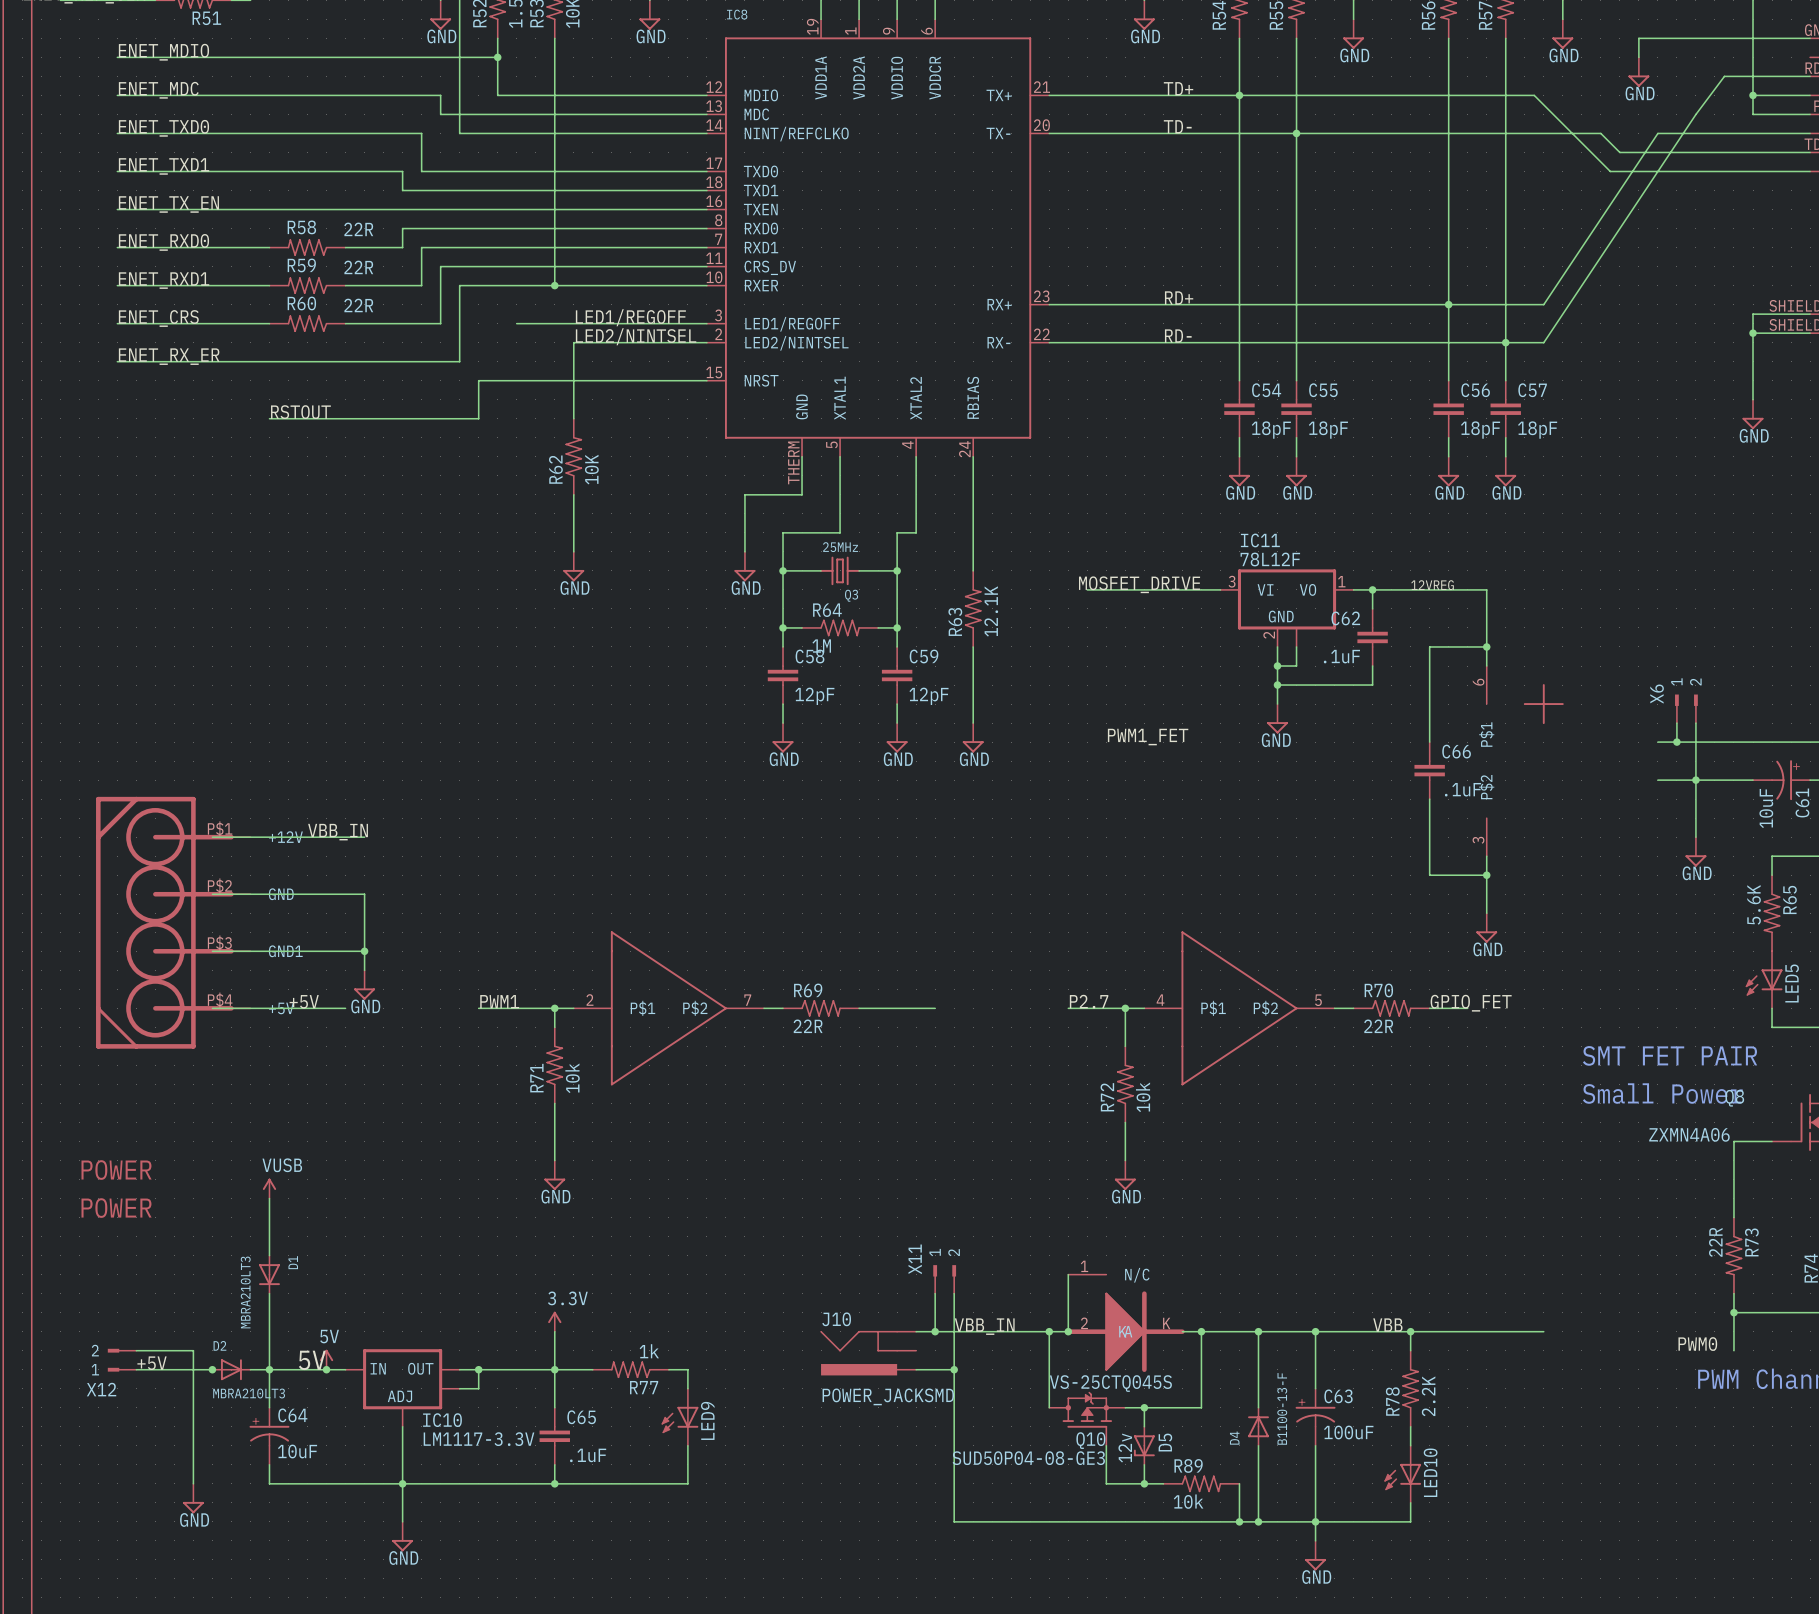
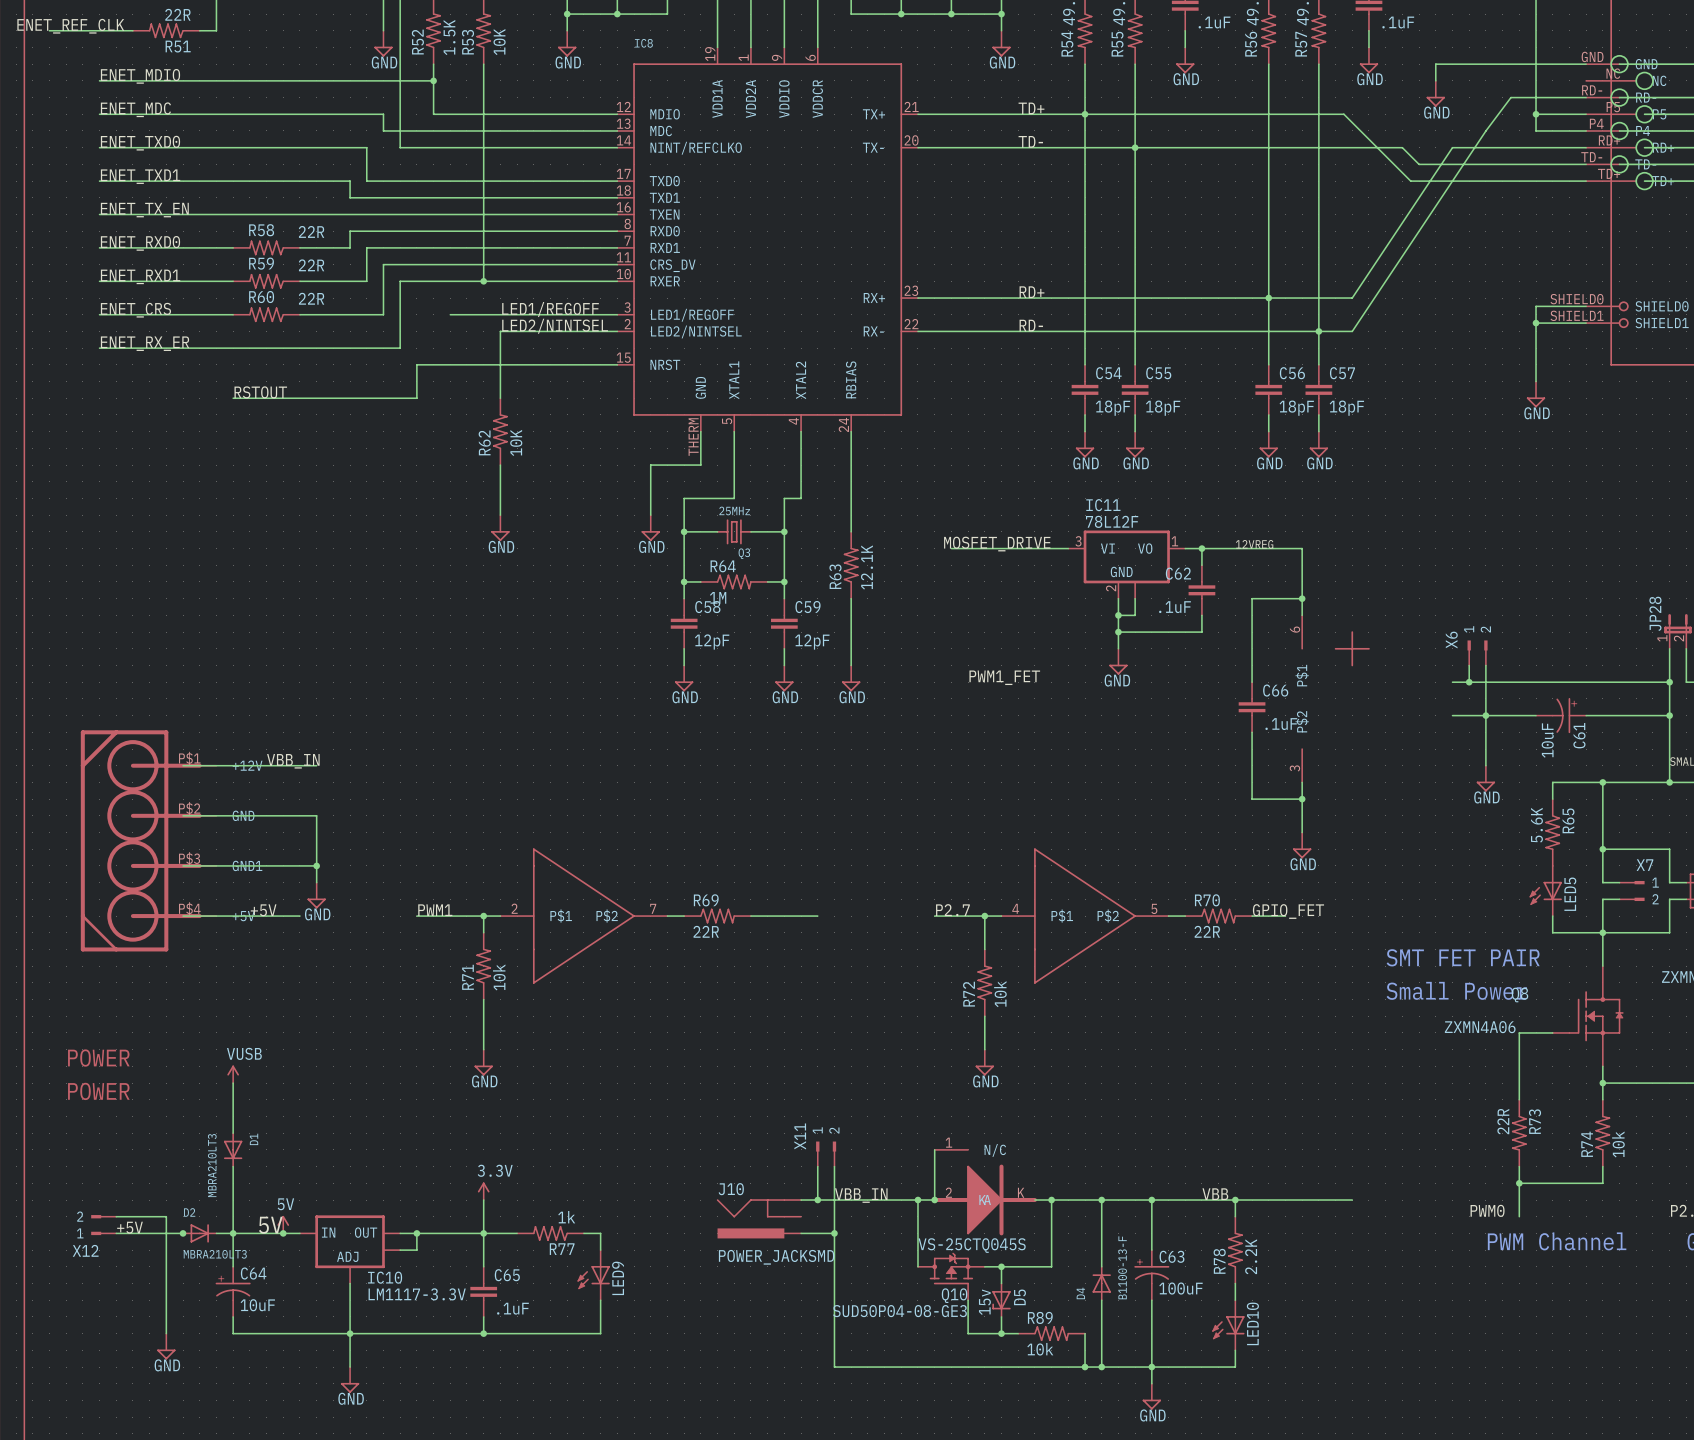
D5 value: 12v (1125, 1448) -> 15v (984, 1302)

